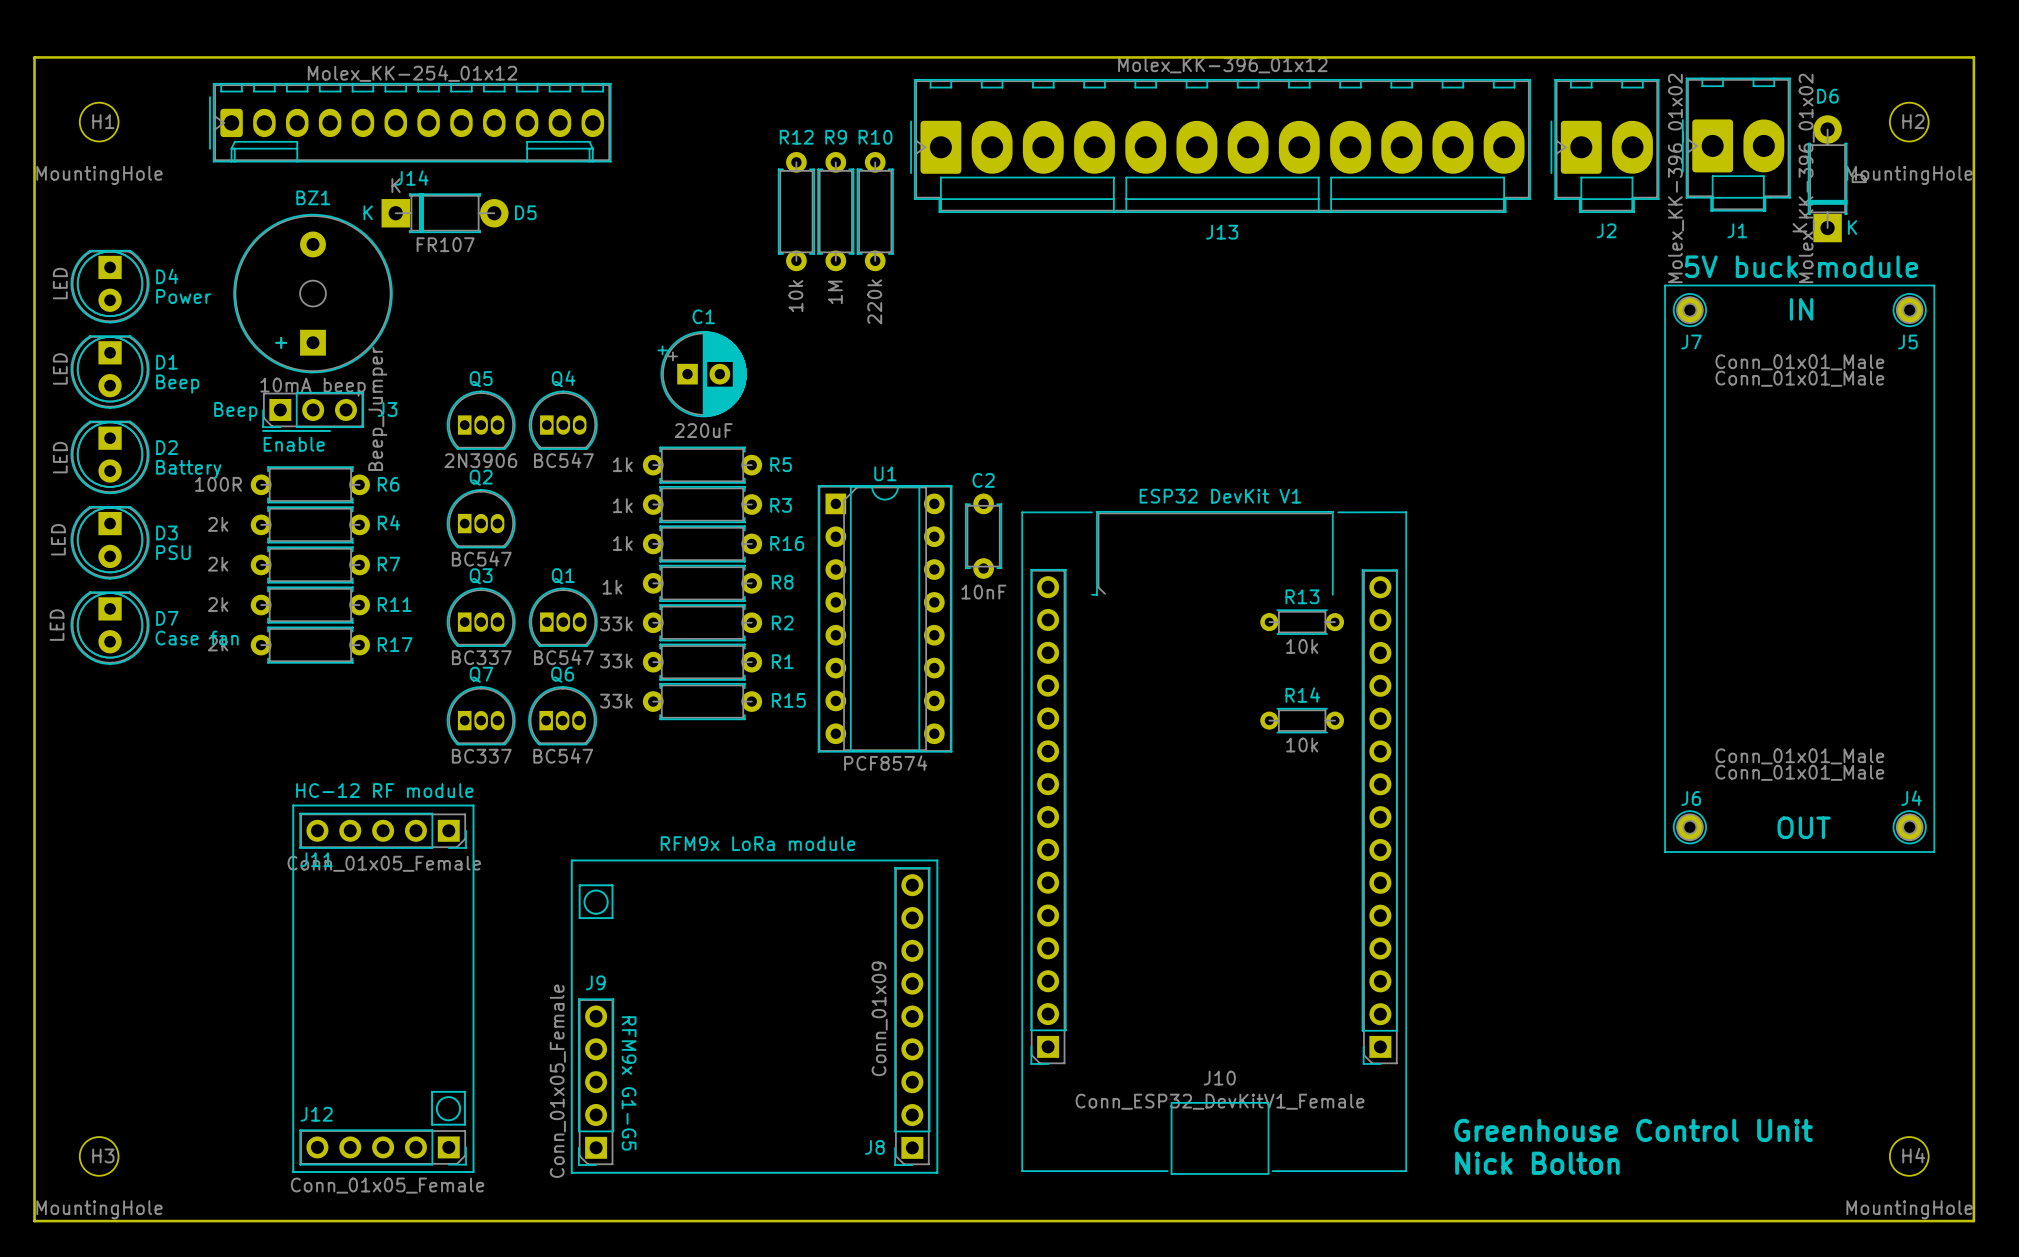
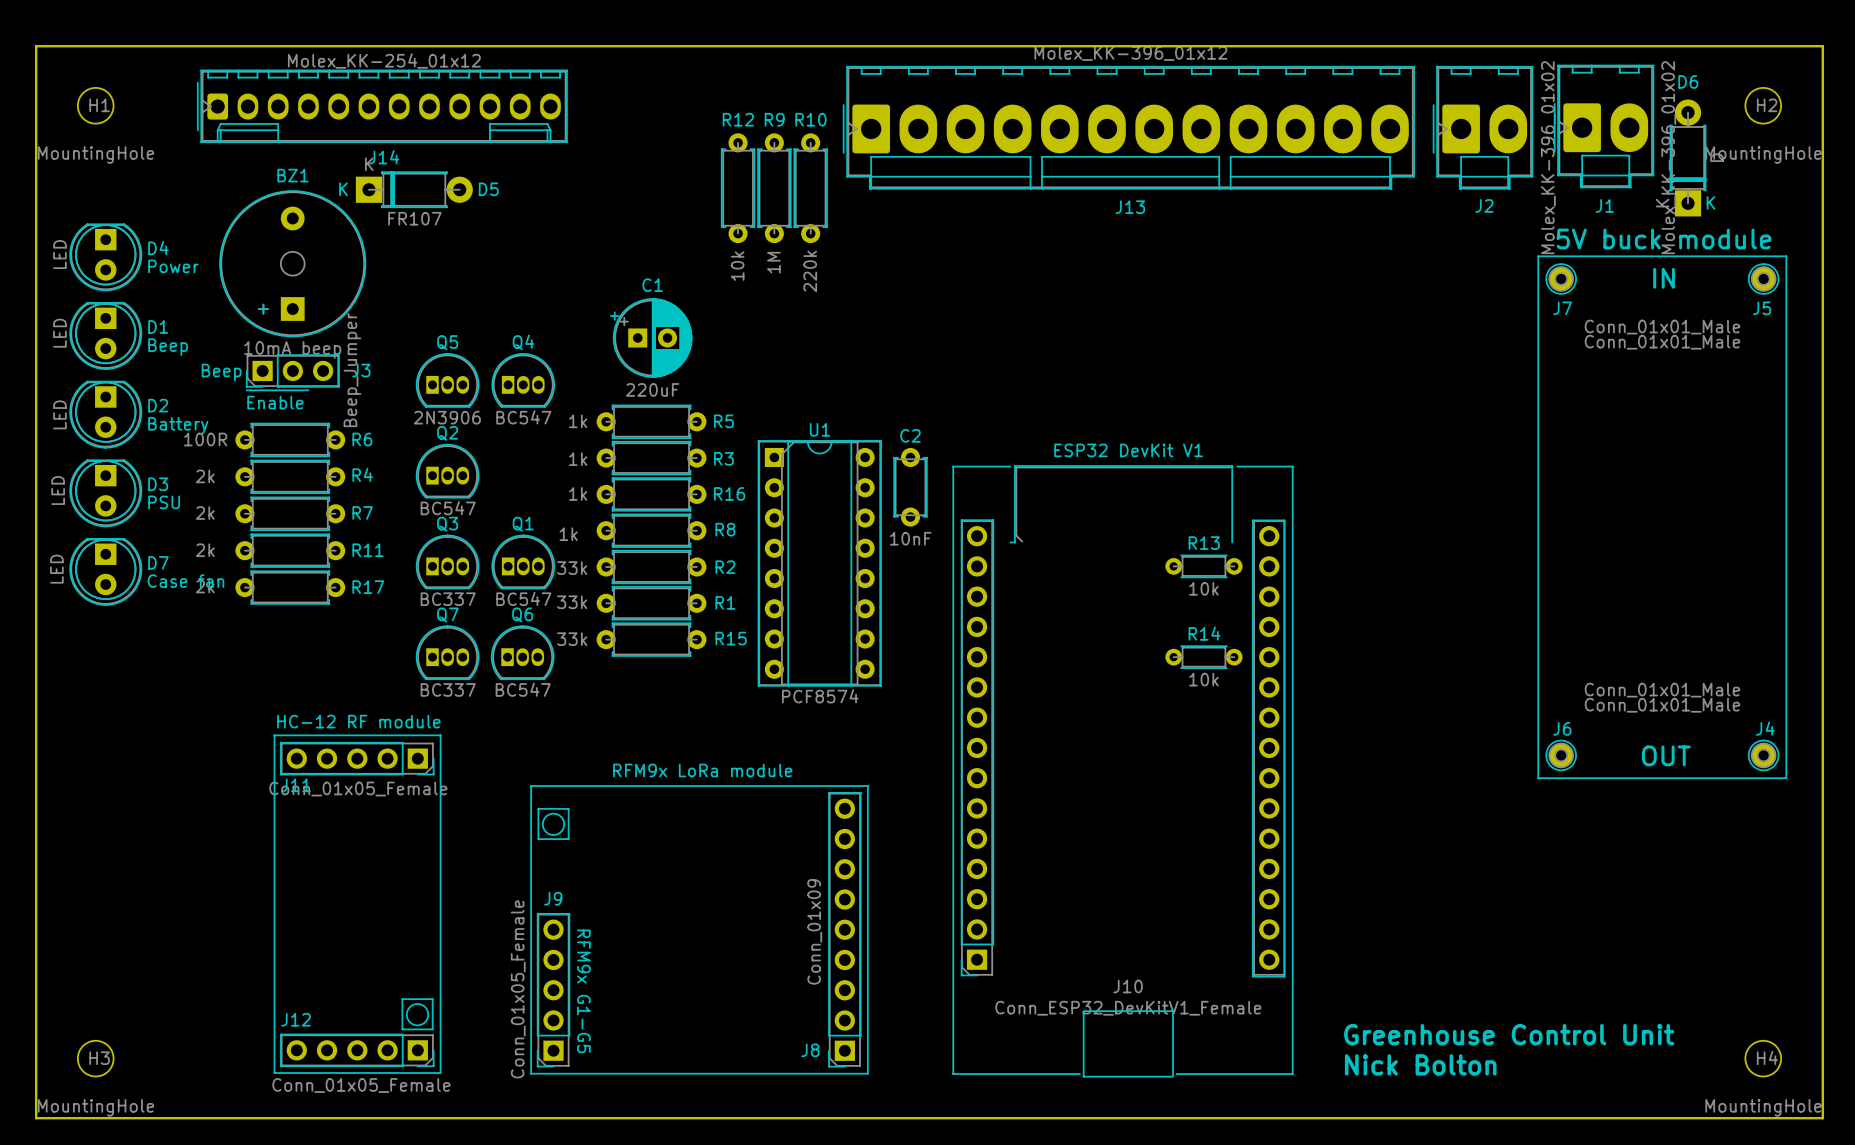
J10 footprint: [1021, 511, 1407, 1175] -> [952, 465, 1294, 1078]

